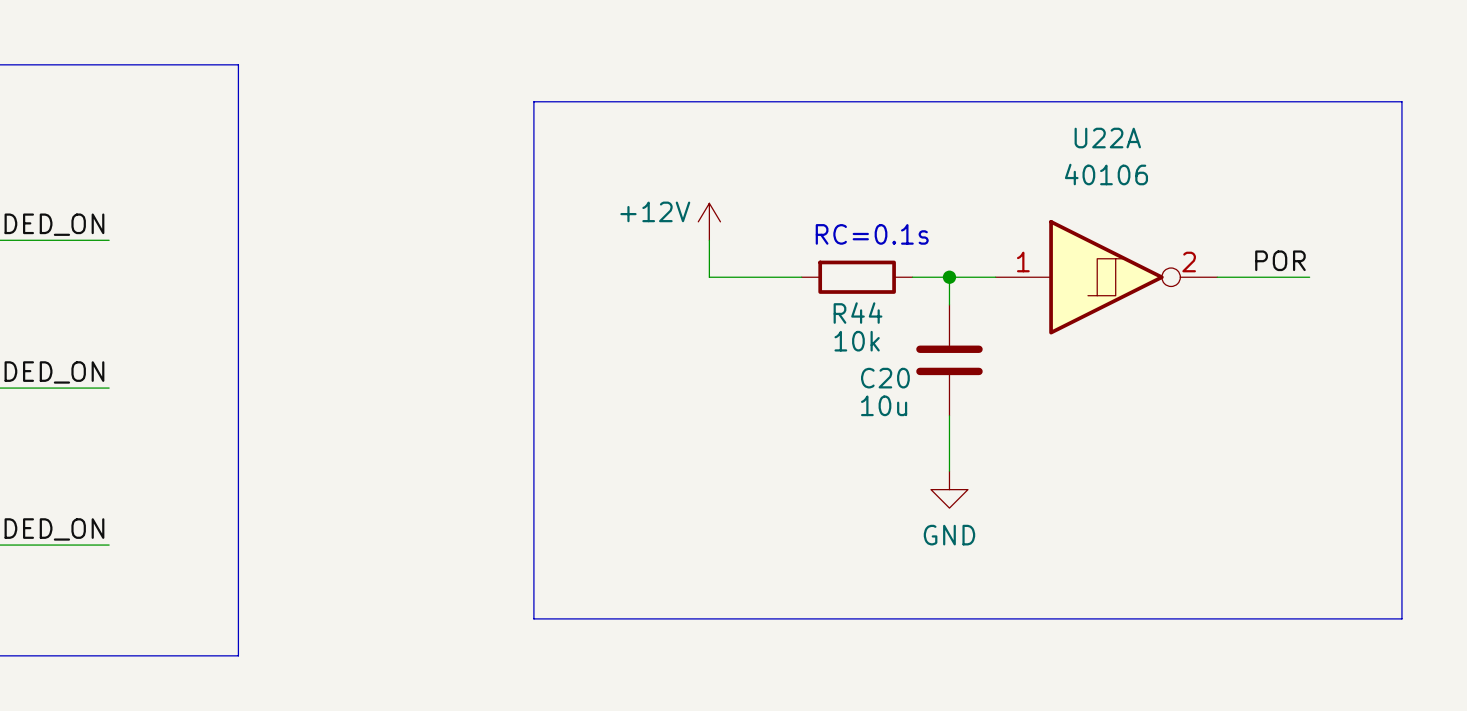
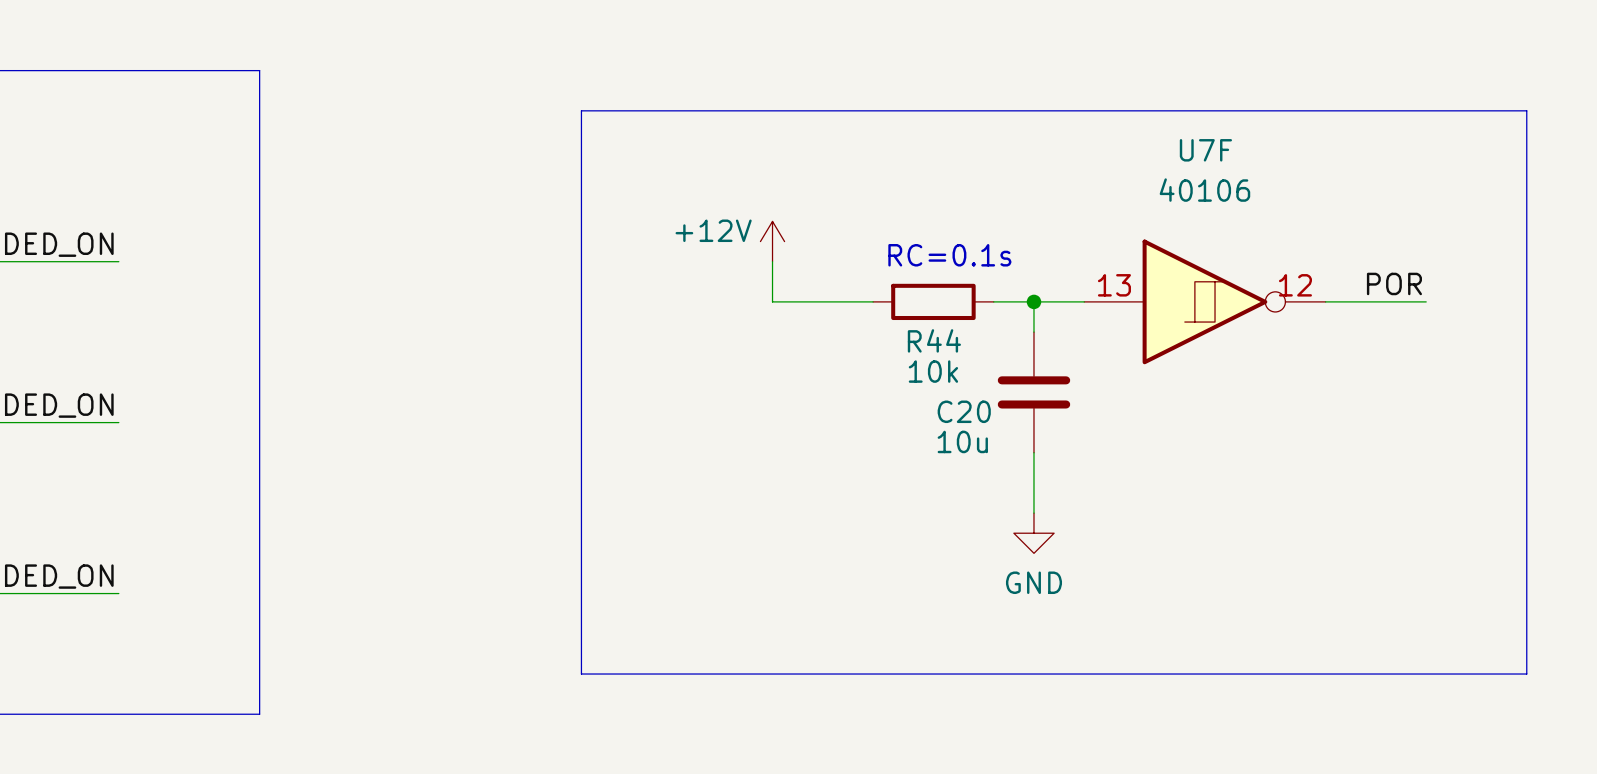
U22A name: U22A (1107, 138) -> U7F (1205, 150)
U22A pin number: 1 (1023, 262) -> 13 (1114, 285)
U22A pin number: 2 (1189, 262) -> 12 (1295, 285)

